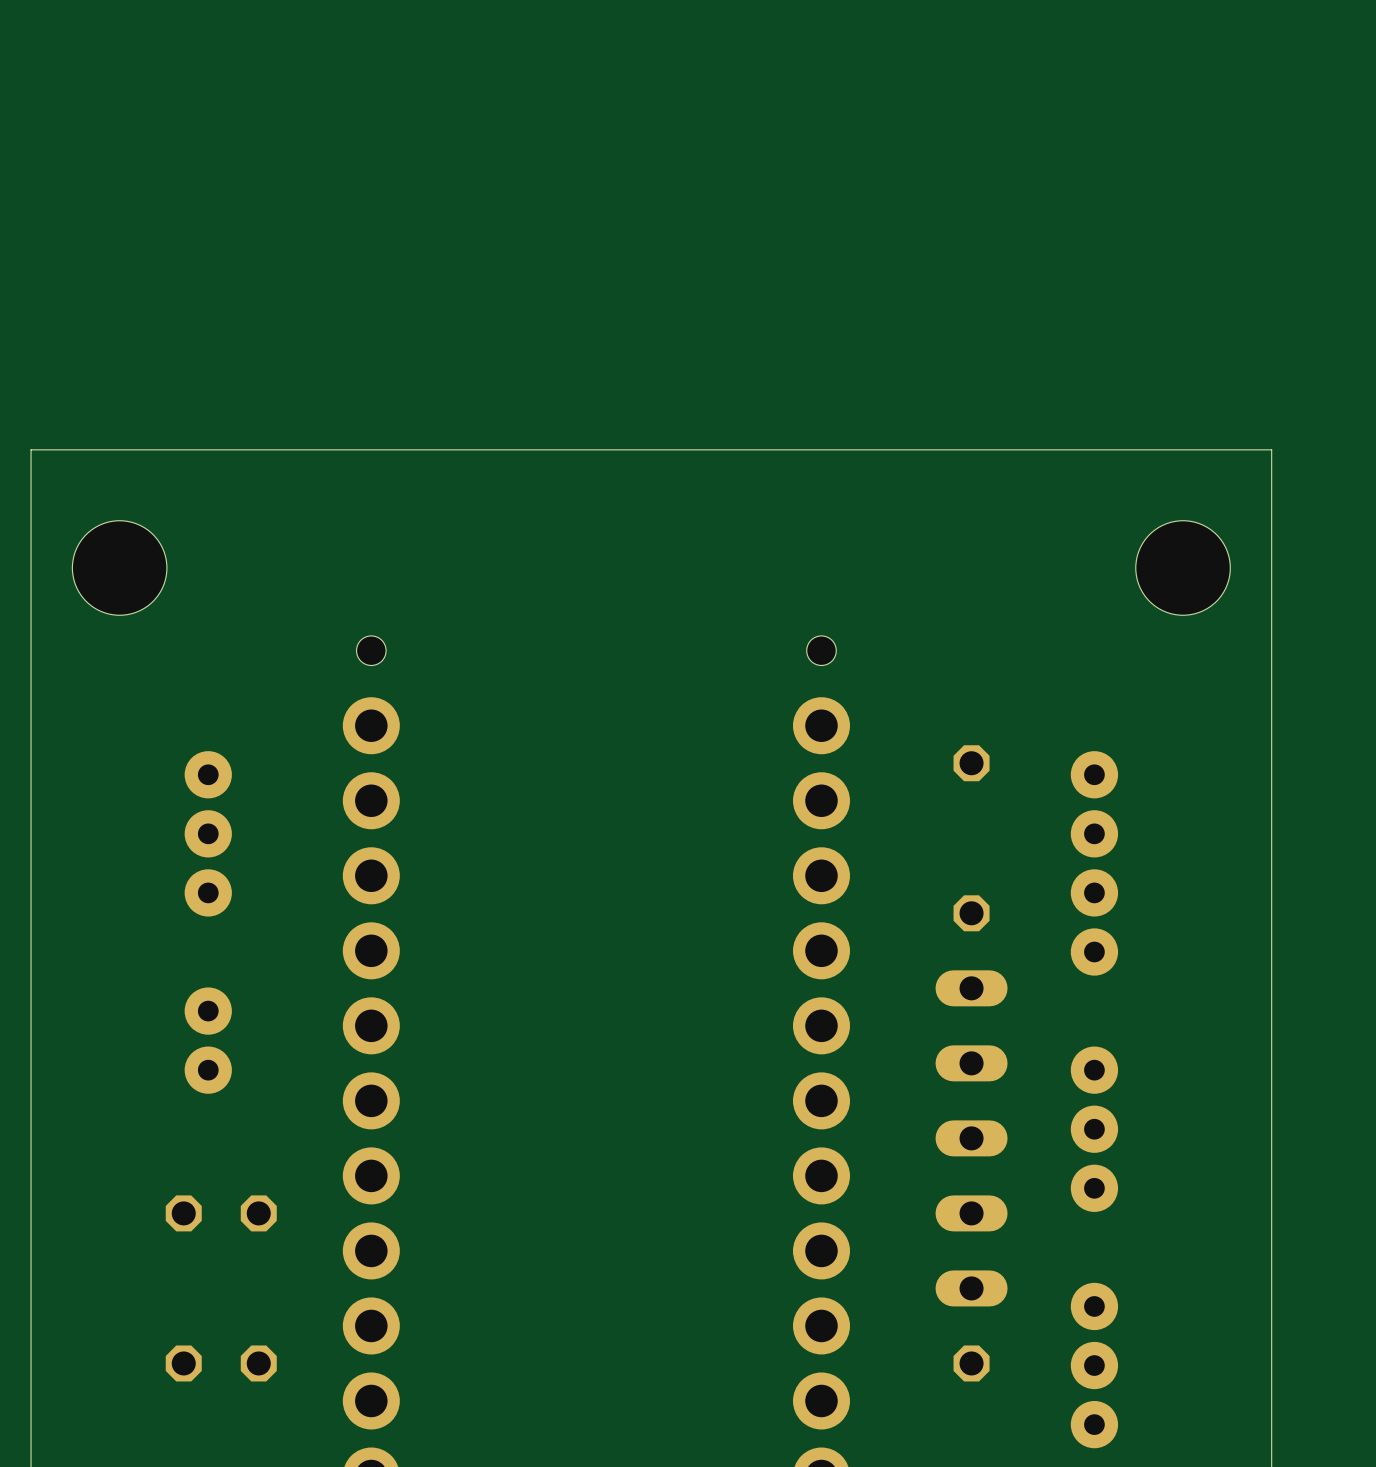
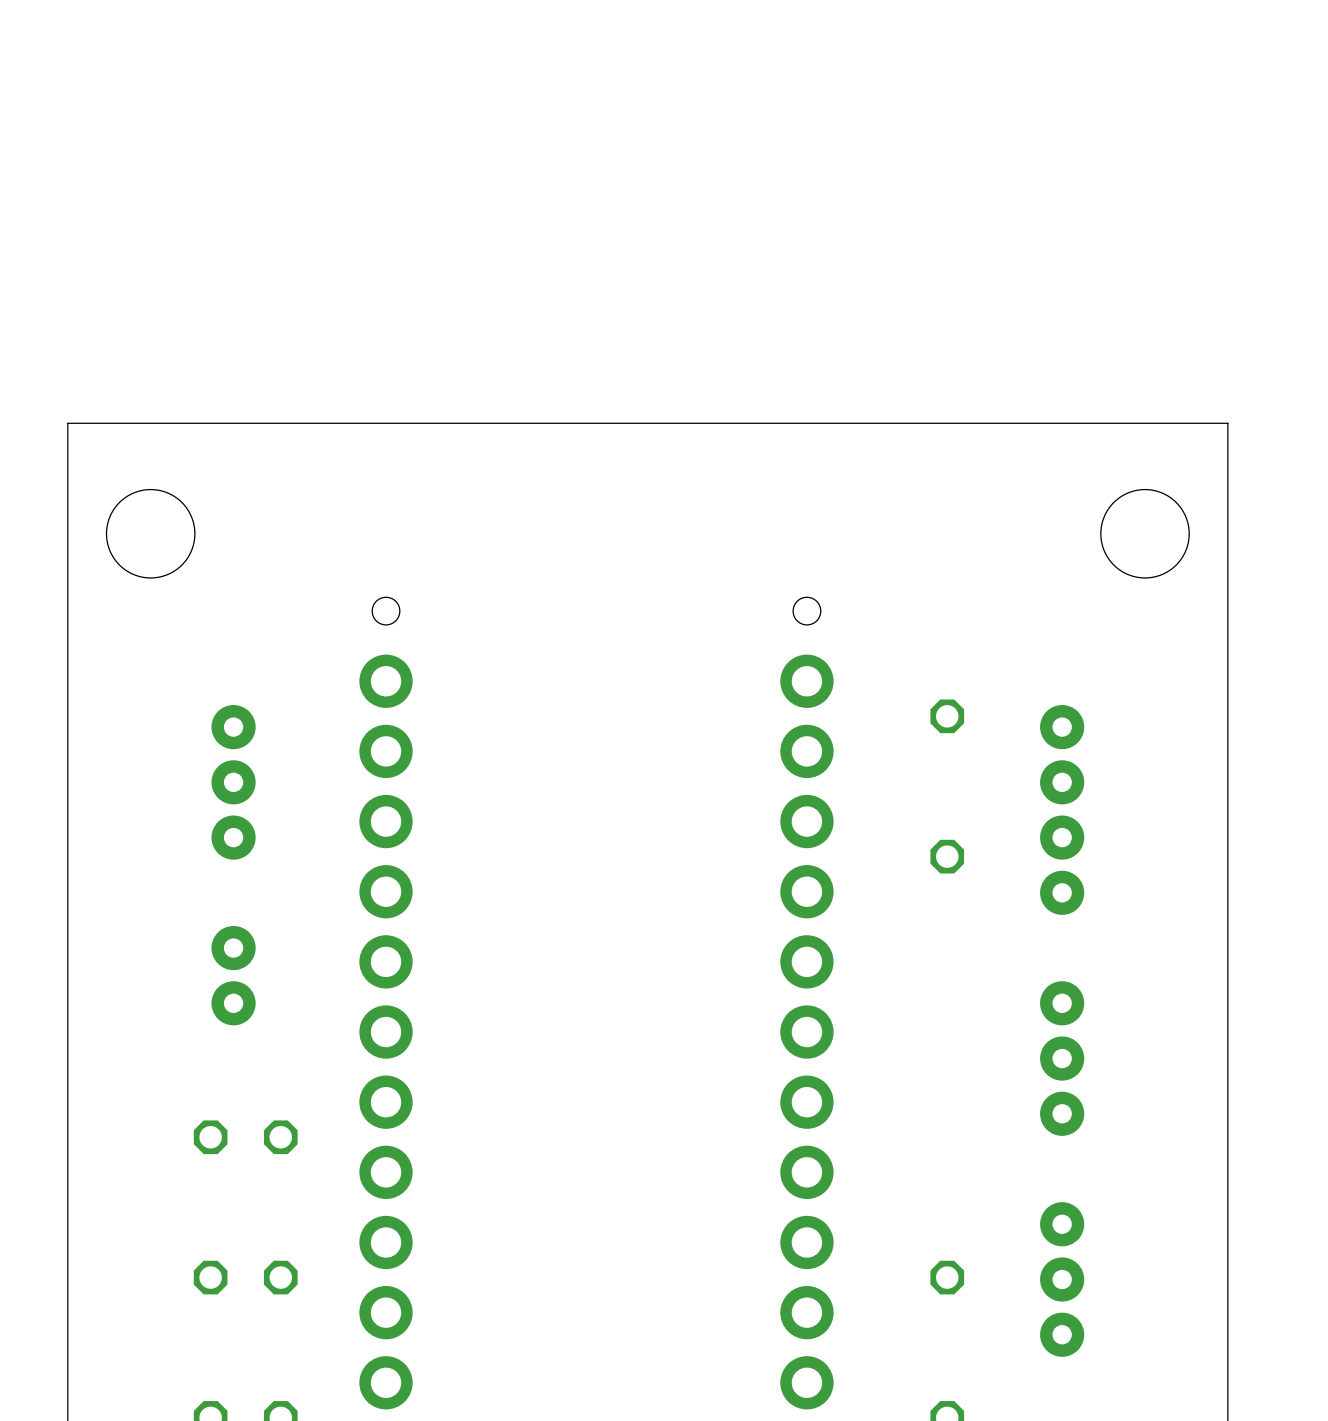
part: (971, 1138) -> none

